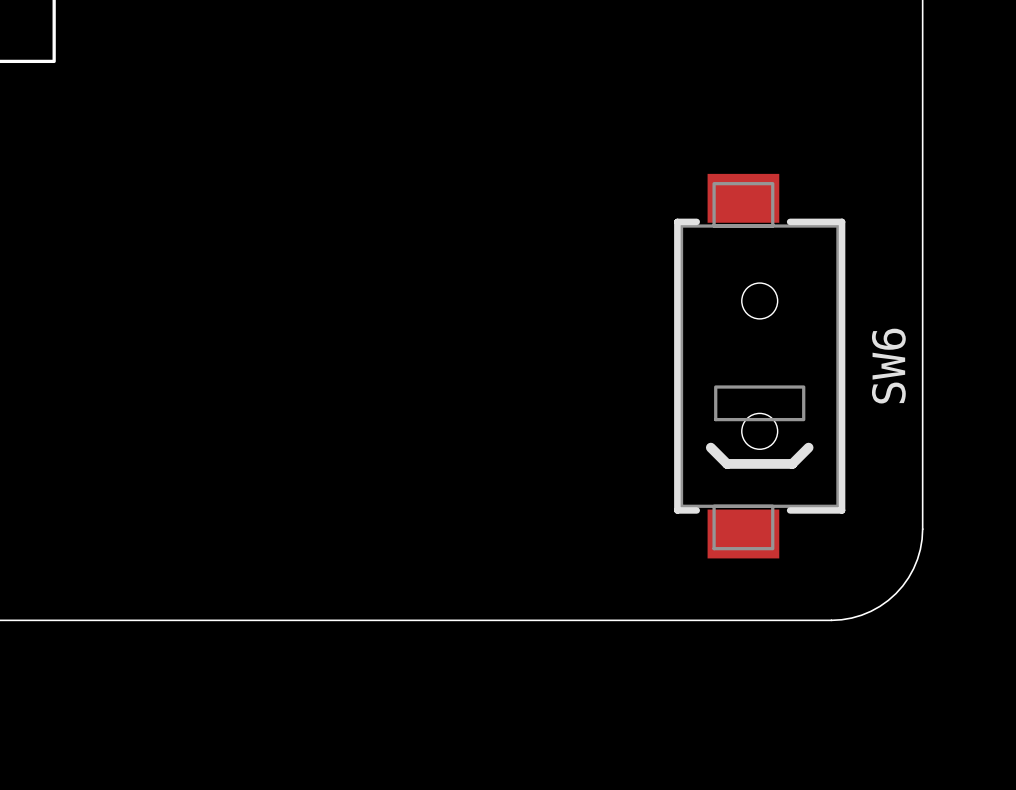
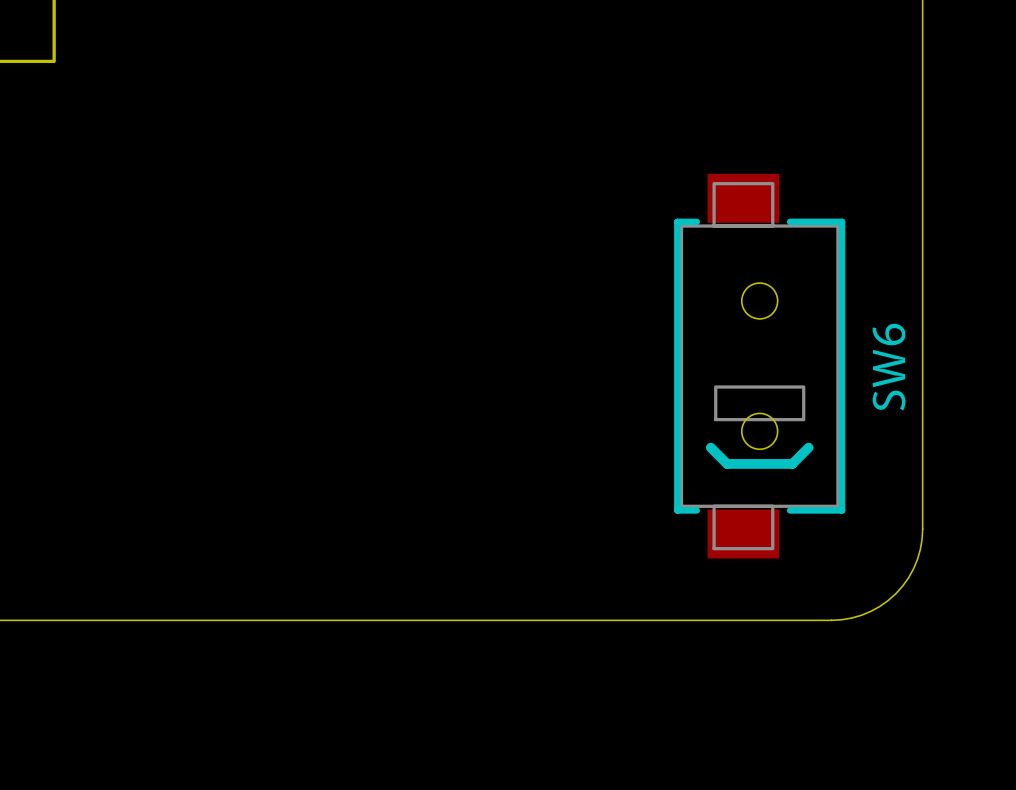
SW6 footprint: [674, 173, 846, 559] -> [674, 173, 846, 559]

